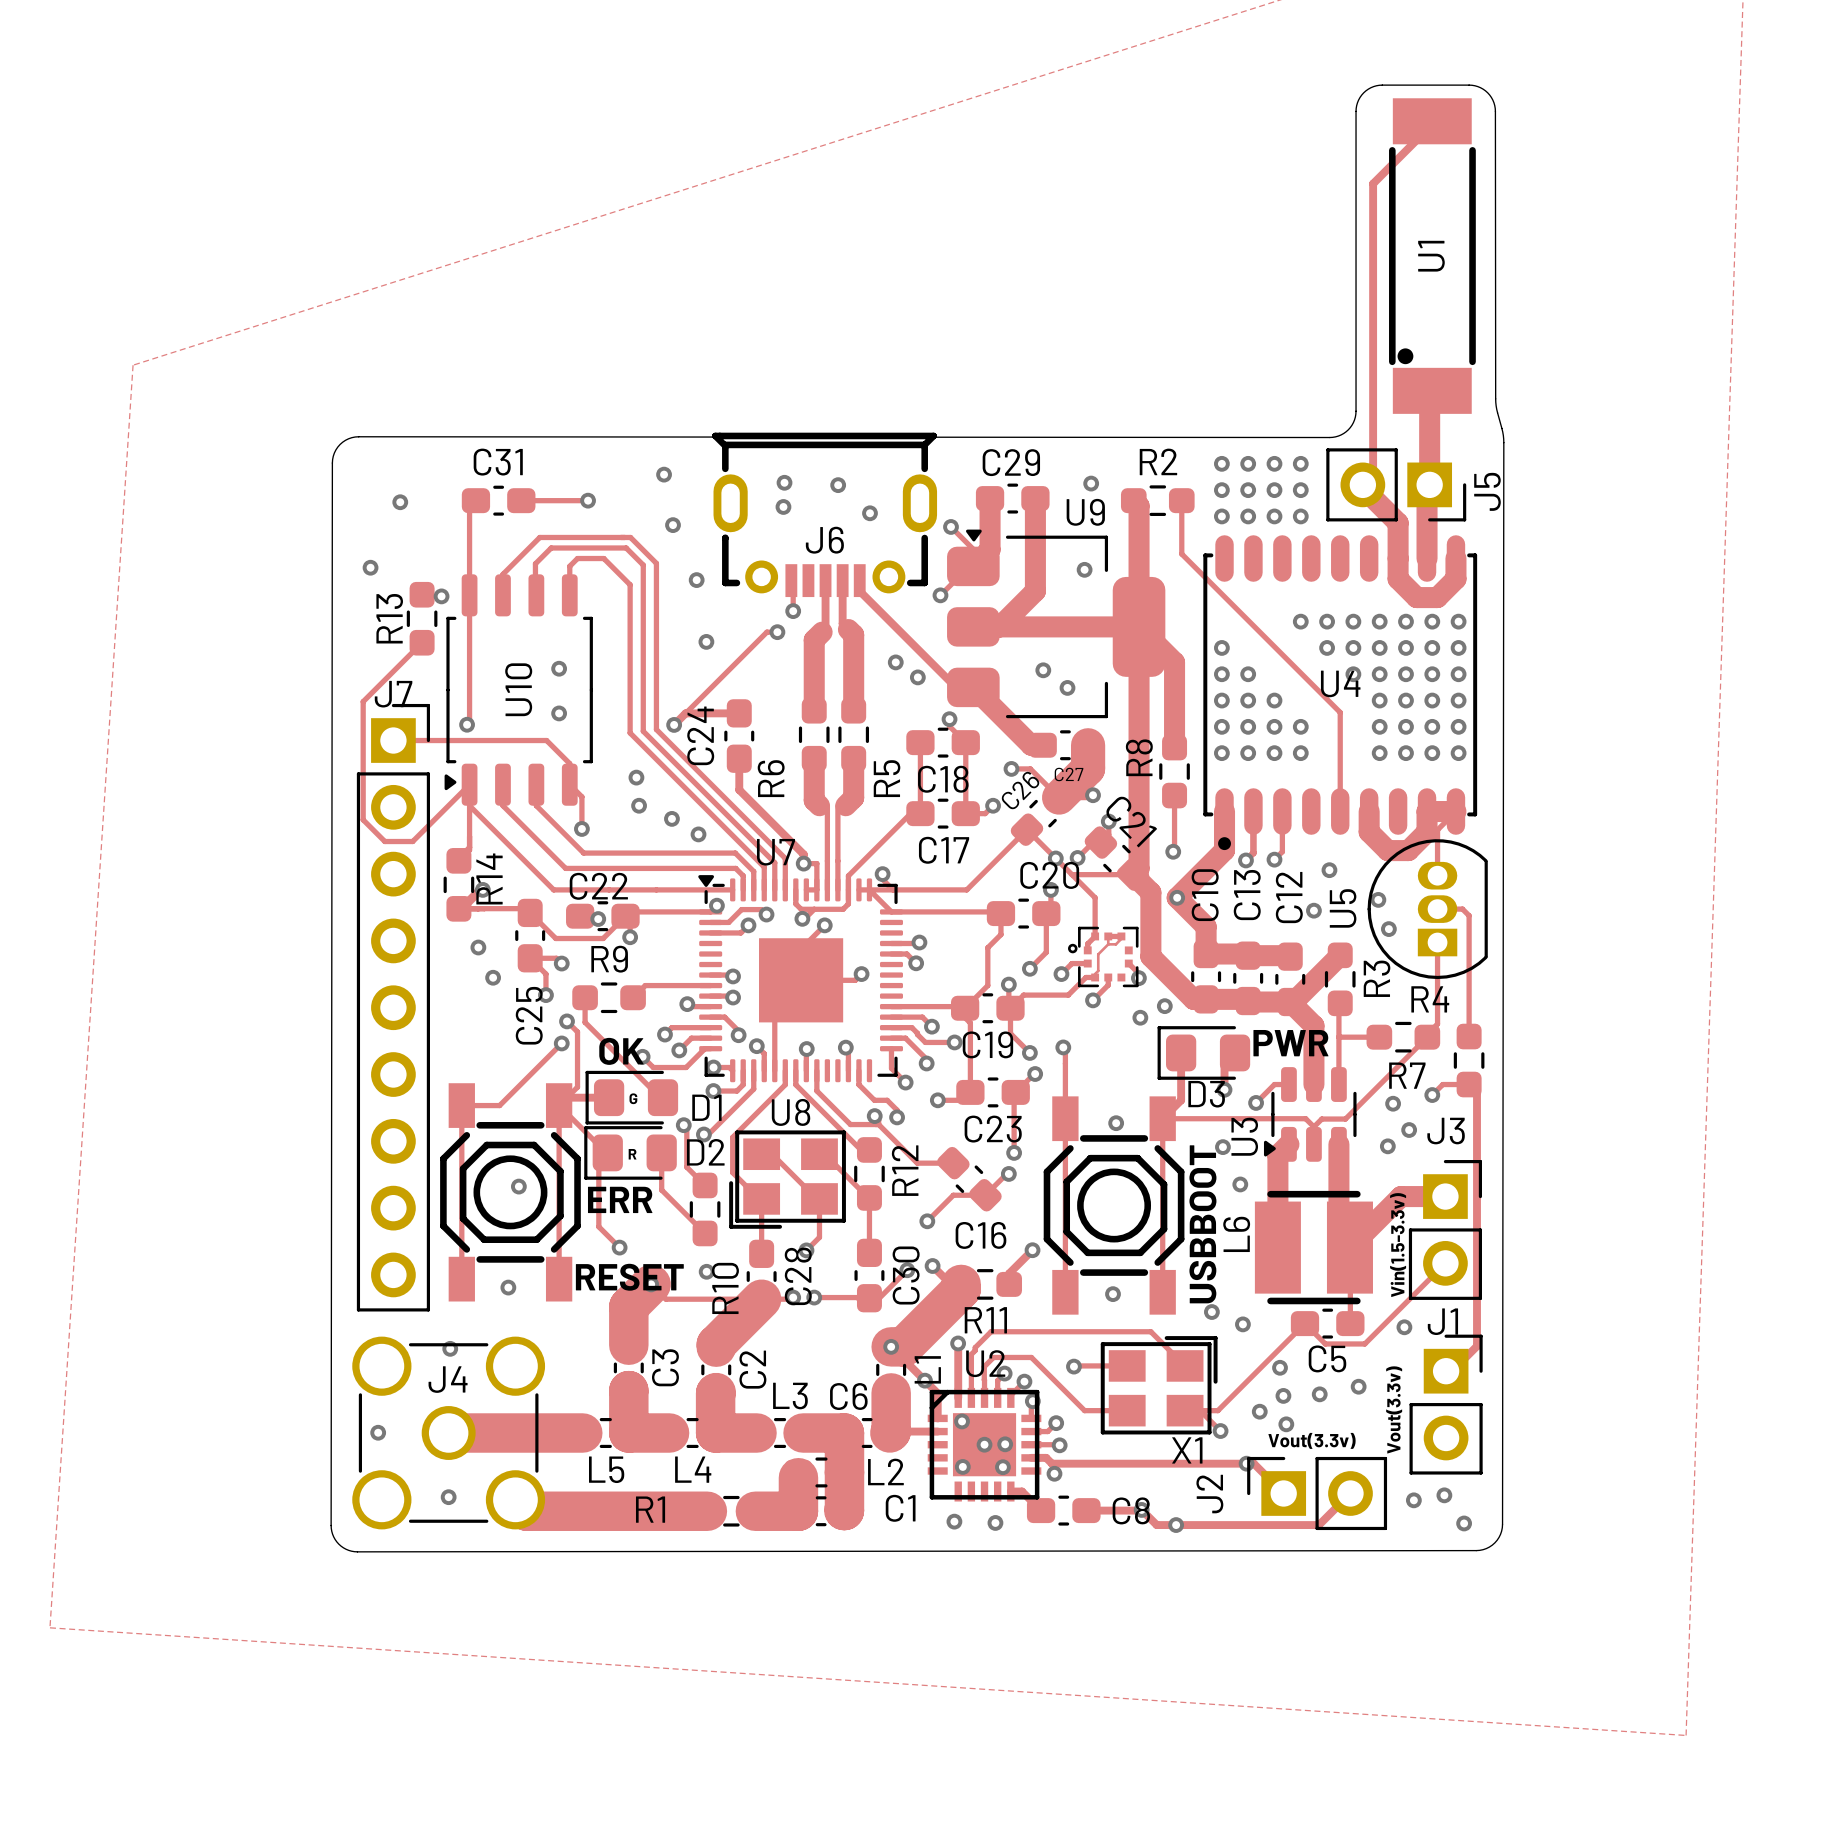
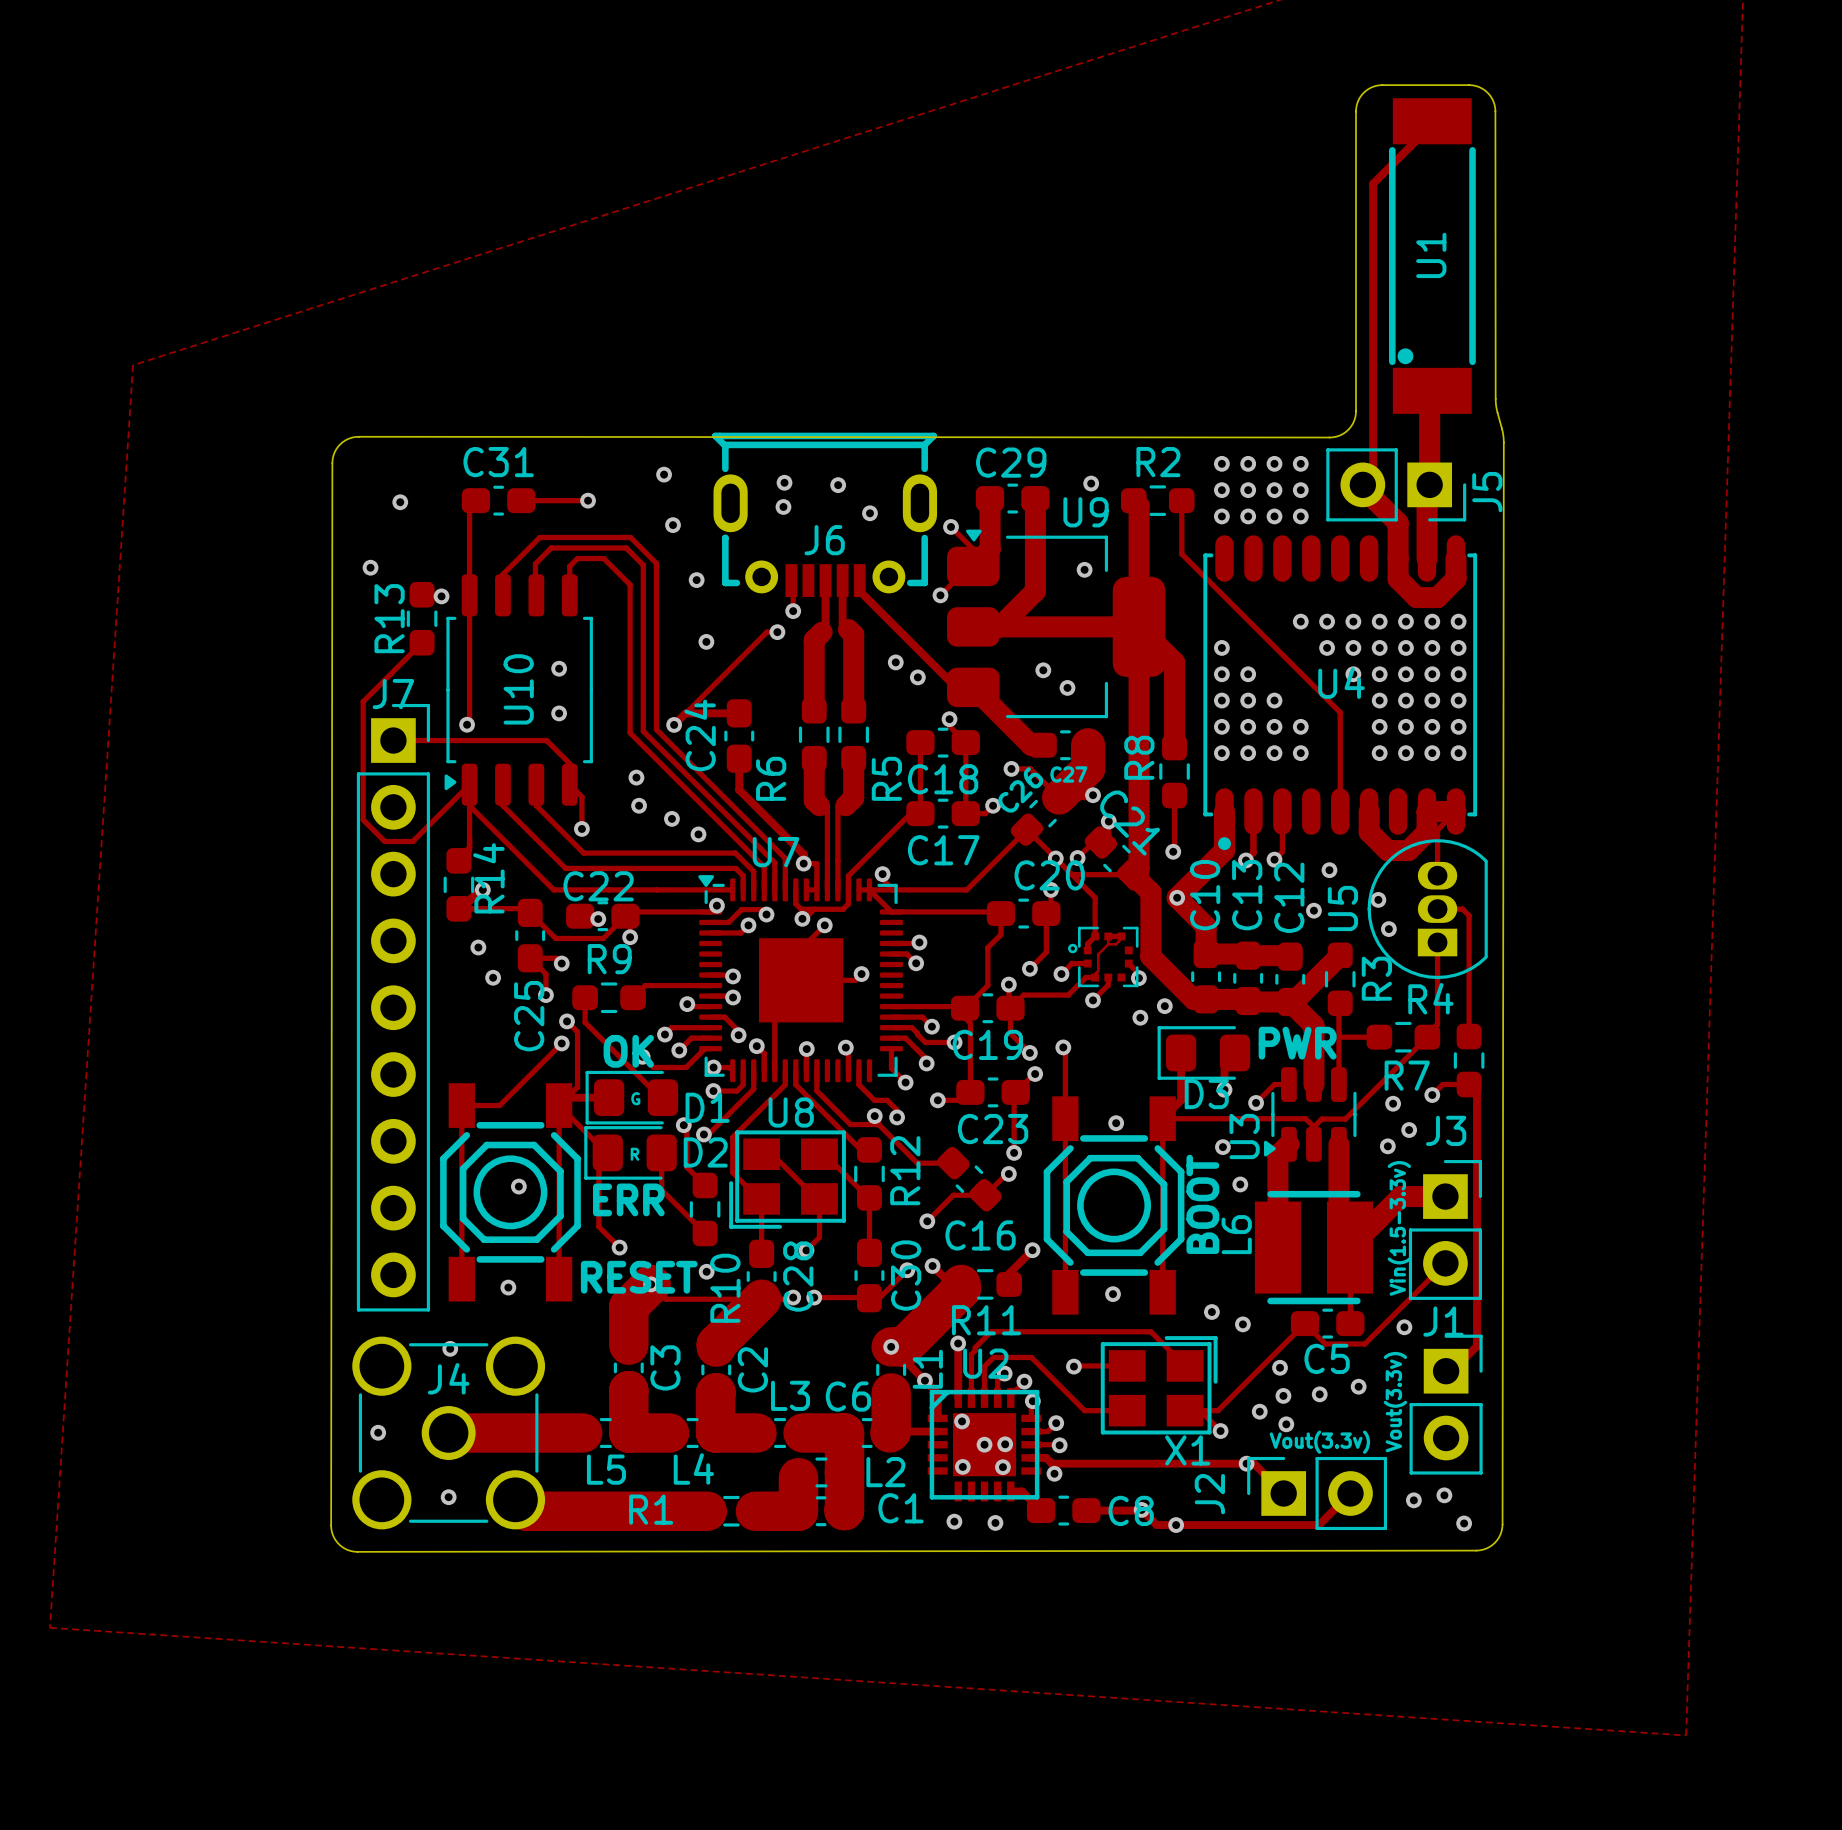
text: USBBOOT (1202, 1224) -> BOOT (1202, 1204)

